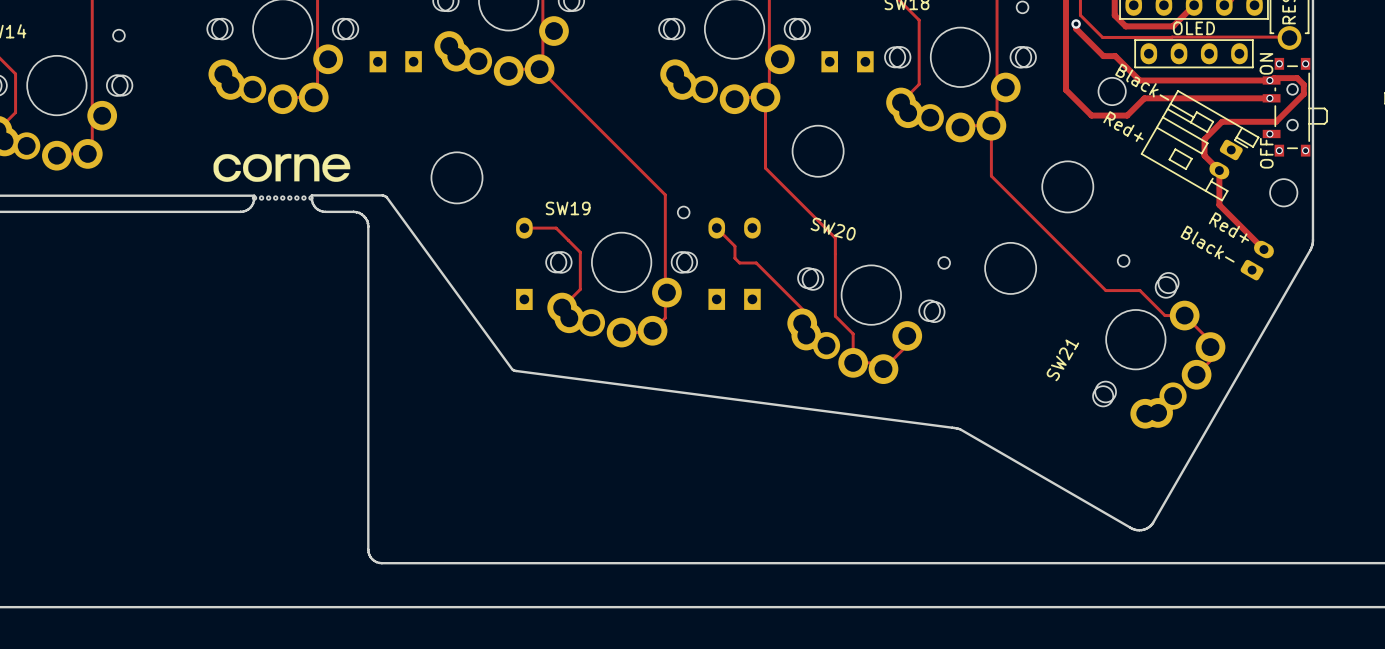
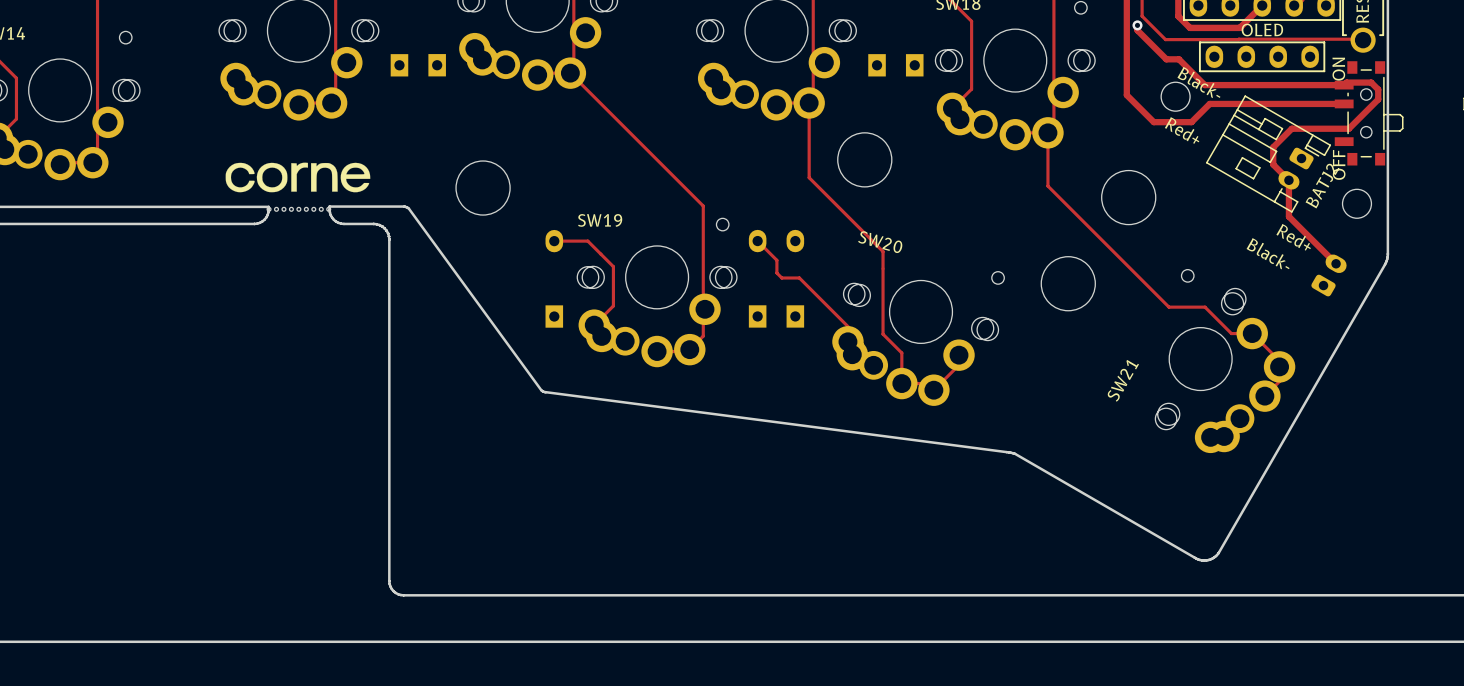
via: (1279, 63) -> none
via: (1305, 63) -> none
via: (1269, 80) -> none
via: (1269, 98) -> none
via: (1269, 133) -> none
via: (1279, 150) -> none
via: (1305, 150) -> none
BATJ2 name: none -> BATJ2 (1322, 186)

